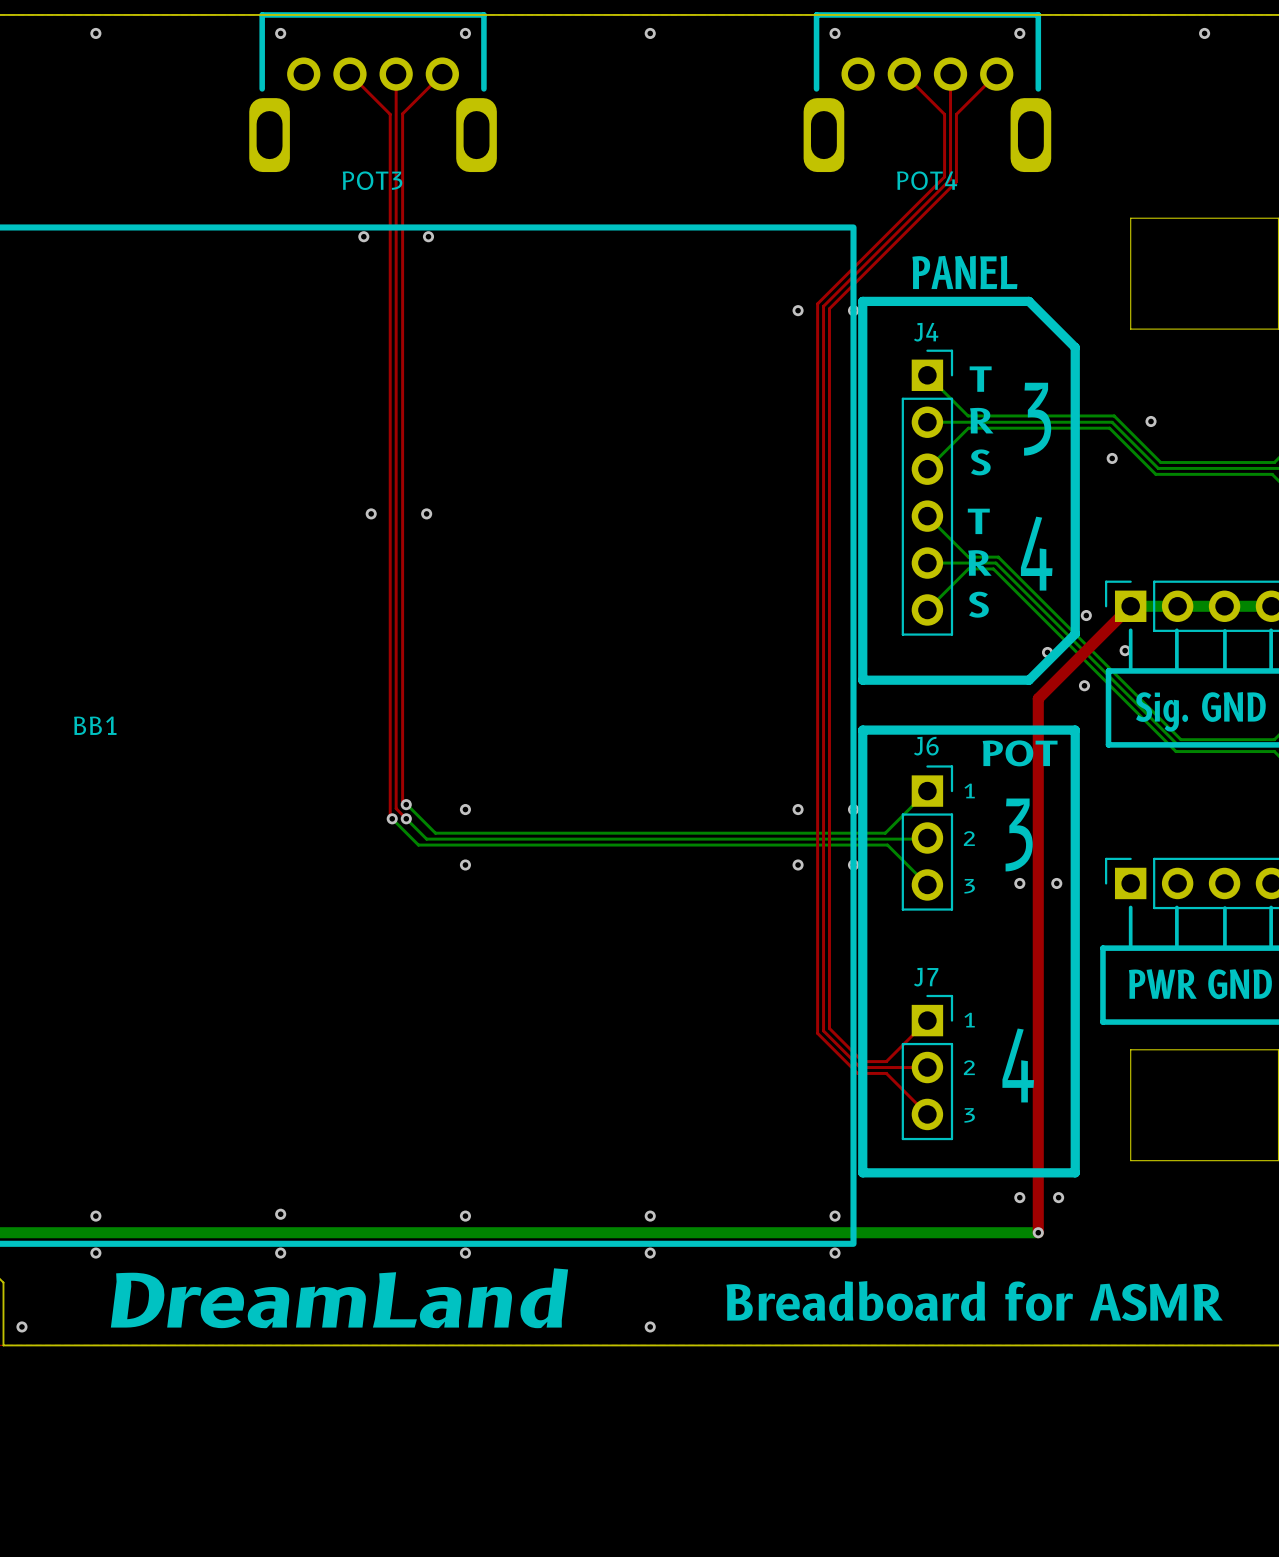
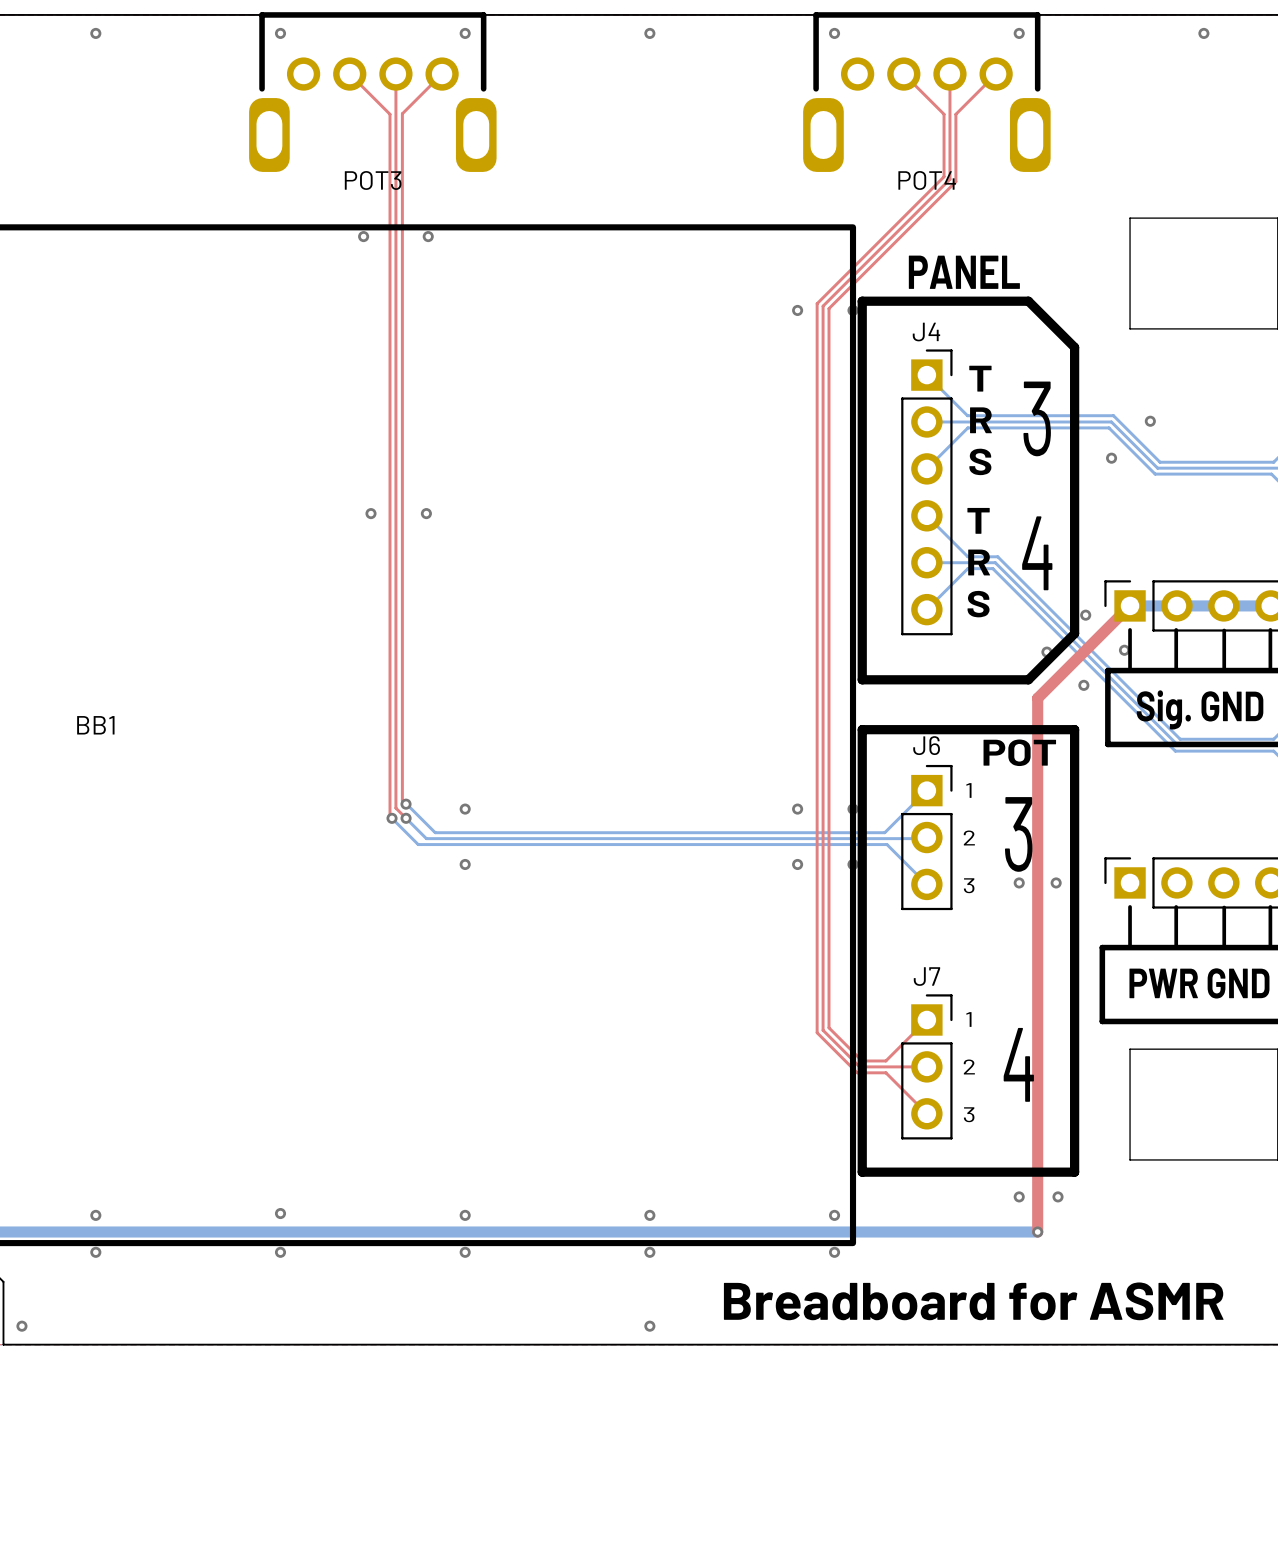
text: DreamLand (339, 1298) -> none

